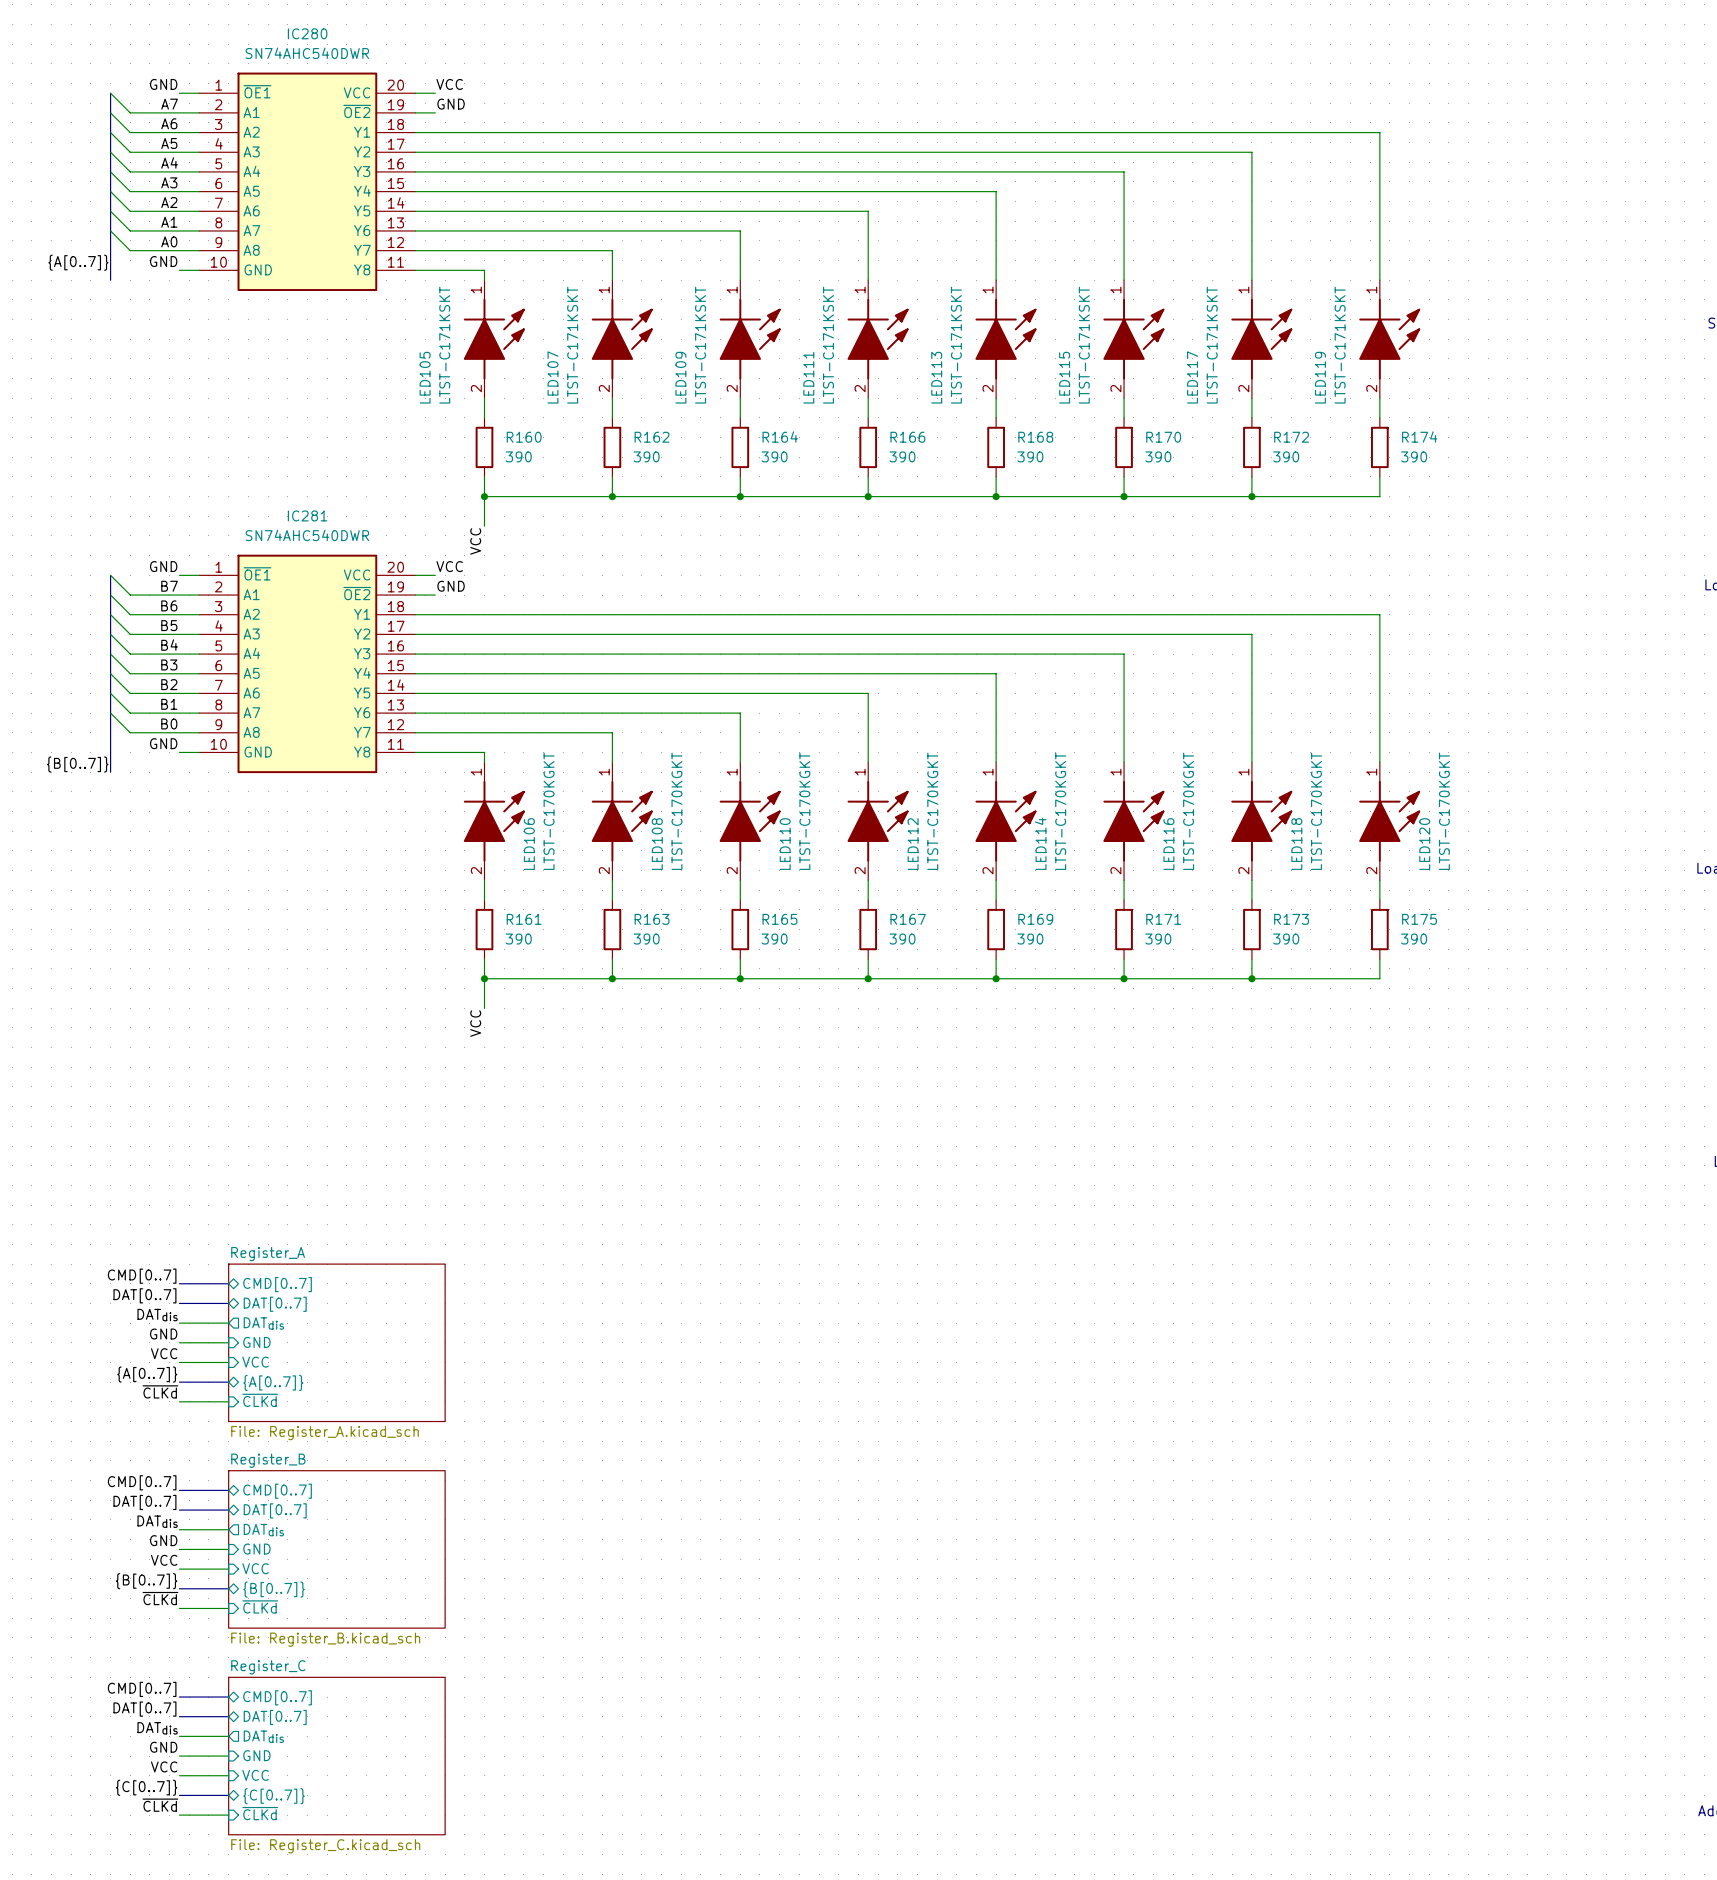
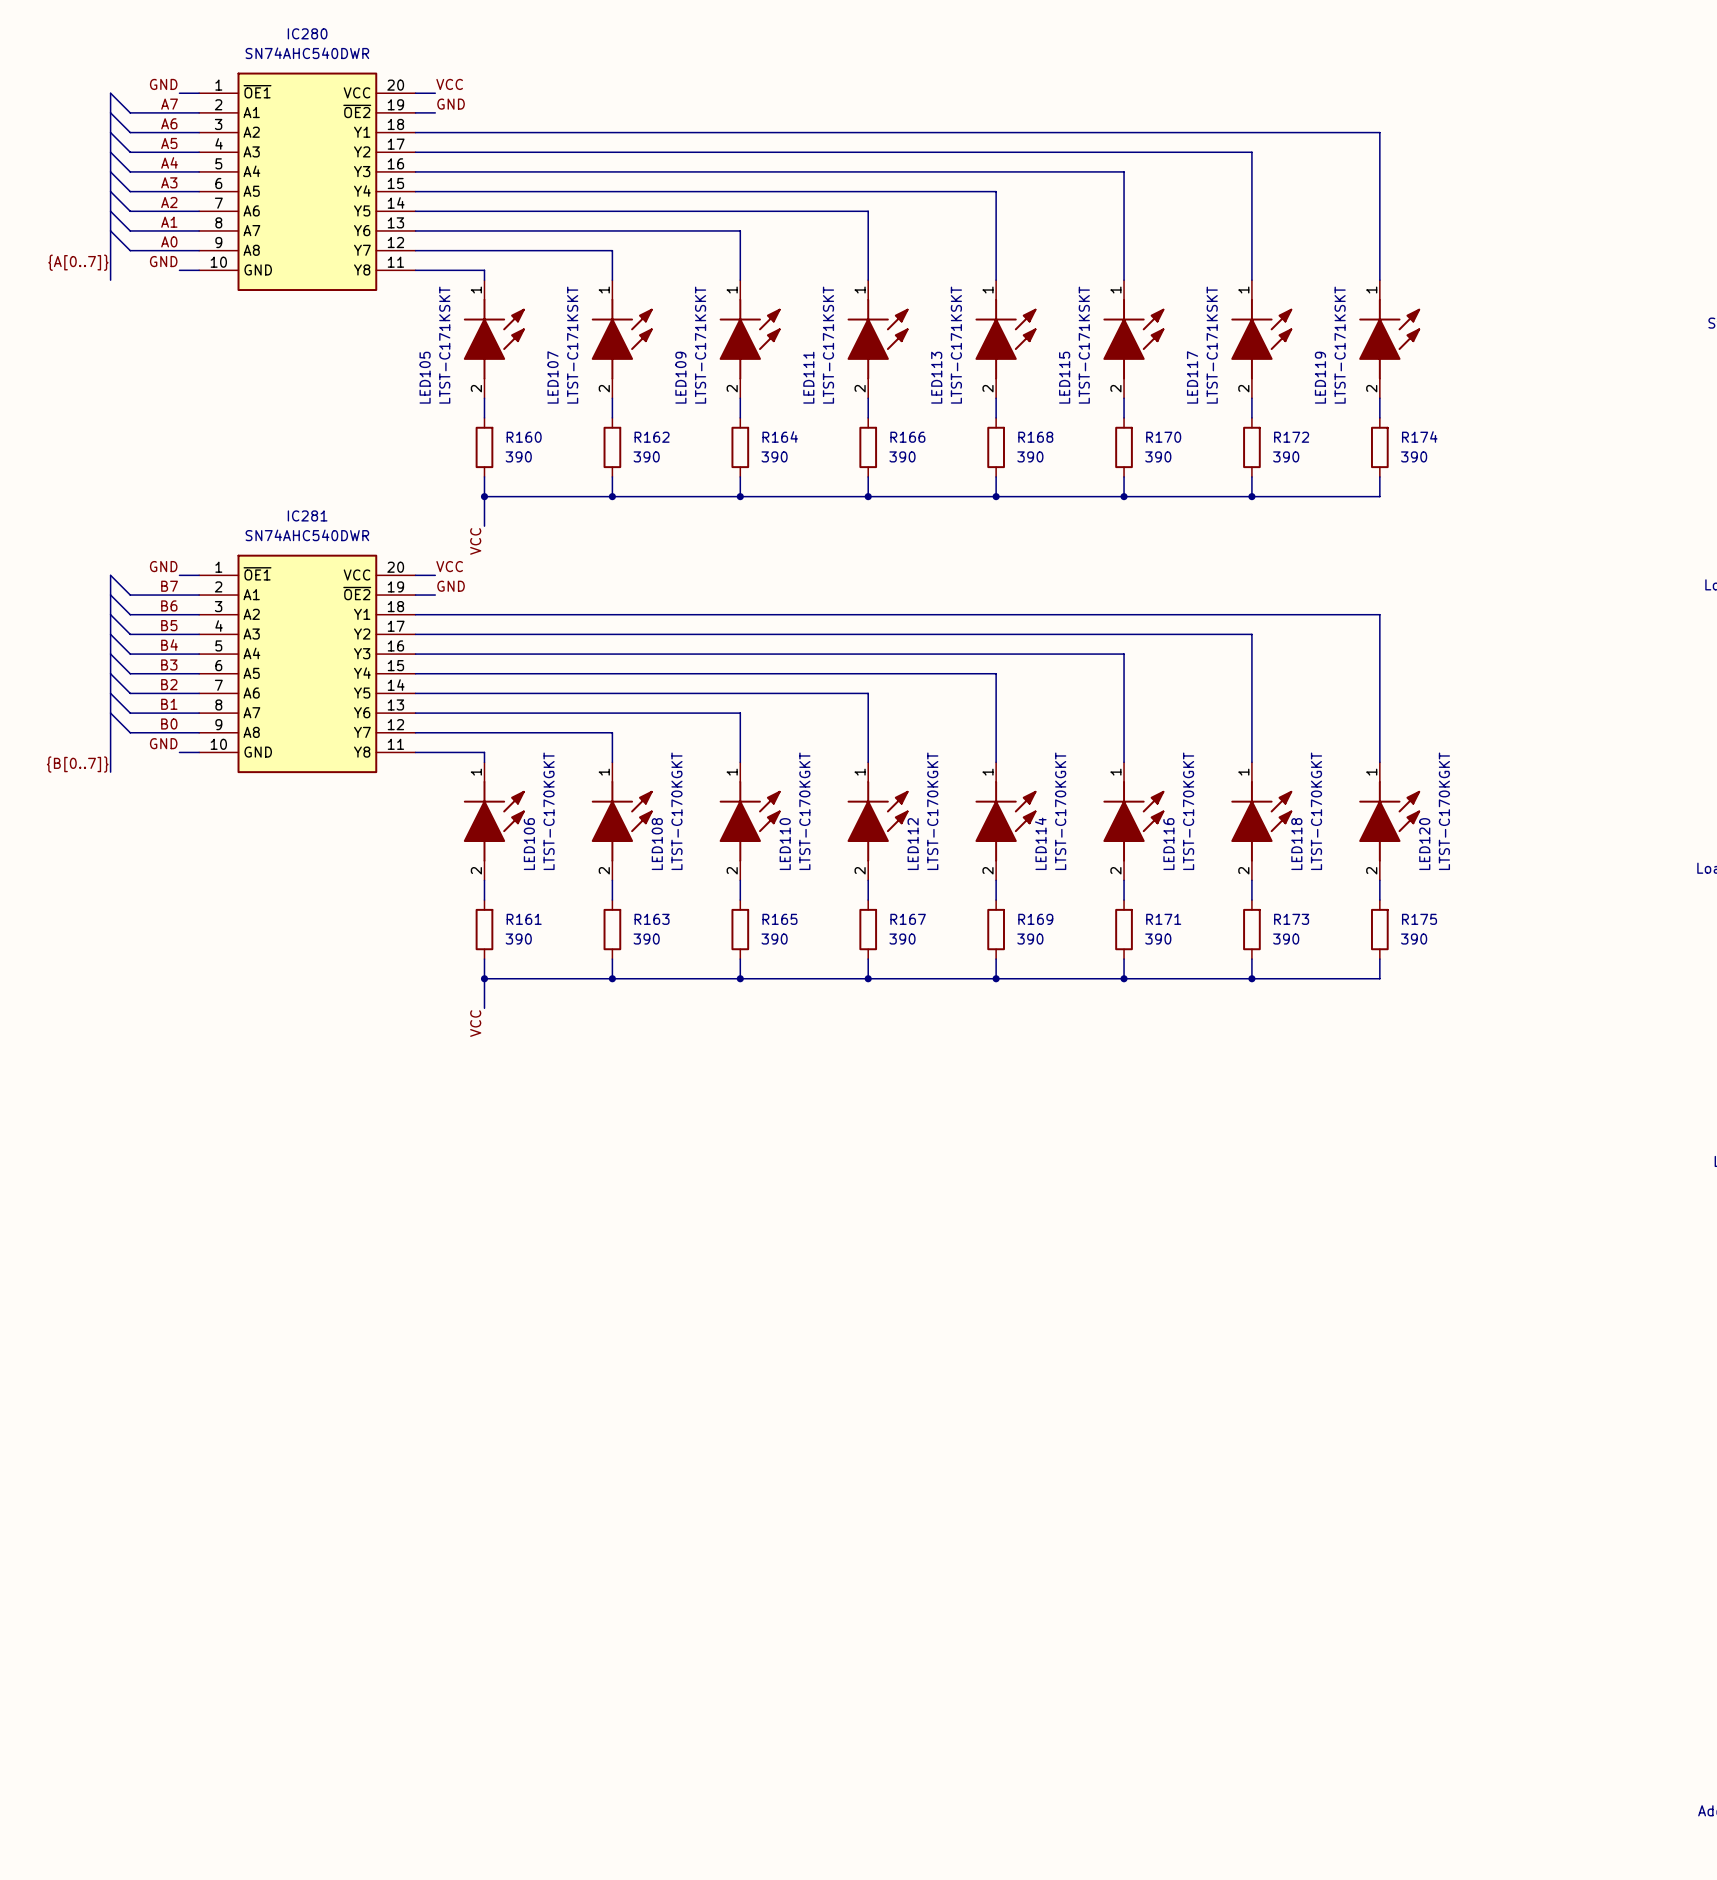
label: CMD[0..7] (142, 1276) -> none
bus: (179, 1283) (228, 1283) -> none
sheet pin: CMD[0..7] (277, 1284) -> none
label: DAT[0..7] (144, 1295) -> none
bus: (179, 1303) (228, 1303) -> none
sheet pin: DAT[0..7] (275, 1304) -> none
label: DATdis (157, 1315) -> none
wire: (179, 1323) (228, 1323) -> none
sheet pin: DATdis (263, 1323) -> none
label: GND (163, 1334) -> none
wire: (179, 1342) (228, 1342) -> none
sheet pin: GND (256, 1342) -> none
sheet Register_A: File: Register_A.kicad_sch (336, 1342) -> none
label: VCC (164, 1353) -> none
wire: (179, 1362) (228, 1362) -> none
sheet pin: VCC (255, 1362) -> none
label: {A[0..7]} (147, 1374) -> none
bus: (179, 1382) (228, 1382) -> none
sheet pin: {A[0..7]} (273, 1382) -> none
label: ~{CLKd} (160, 1391) -> none
sheet pin: ~{CLKd} (260, 1400) -> none
wire: (179, 1401) (228, 1401) -> none
label: CMD[0..7] (142, 1482) -> none
bus: (179, 1490) (228, 1490) -> none
sheet pin: CMD[0..7] (277, 1491) -> none
label: DAT[0..7] (144, 1502) -> none
bus: (179, 1510) (228, 1510) -> none
sheet pin: DAT[0..7] (275, 1510) -> none
label: DATdis (157, 1521) -> none
wire: (179, 1529) (228, 1529) -> none
sheet pin: DATdis (263, 1530) -> none
label: GND (163, 1540) -> none
wire: (179, 1549) (228, 1549) -> none
sheet pin: GND (256, 1549) -> none
sheet Register_B: File: Register_B.kicad_sch (336, 1549) -> none
label: VCC (164, 1560) -> none
sheet pin: VCC (255, 1568) -> none
wire: (179, 1569) (228, 1569) -> none
label: {B[0..7]} (146, 1581) -> none
bus: (179, 1588) (228, 1588) -> none
sheet pin: {B[0..7]} (274, 1589) -> none
label: ~{CLKd} (160, 1598) -> none
sheet pin: ~{CLKd} (260, 1606) -> none
wire: (179, 1608) (228, 1608) -> none
label: CMD[0..7] (142, 1689) -> none
bus: (179, 1697) (228, 1697) -> none
sheet pin: CMD[0..7] (277, 1697) -> none
label: DAT[0..7] (144, 1709) -> none
bus: (179, 1716) (228, 1716) -> none
sheet pin: DAT[0..7] (275, 1717) -> none
label: DATdis (157, 1728) -> none
wire: (179, 1736) (228, 1736) -> none
sheet pin: DATdis (263, 1736) -> none
label: GND (163, 1747) -> none
sheet pin: GND (256, 1755) -> none
wire: (179, 1756) (228, 1756) -> none
sheet Register_C: File: Register_C.kicad_sch (336, 1756) -> none
label: VCC (164, 1766) -> none
wire: (179, 1775) (228, 1775) -> none
sheet pin: VCC (255, 1775) -> none
label: {C[0..7]} (146, 1787) -> none
bus: (179, 1795) (228, 1795) -> none
sheet pin: {C[0..7]} (274, 1796) -> none
label: ~{CLKd} (160, 1805) -> none
sheet pin: ~{CLKd} (260, 1813) -> none
wire: (179, 1815) (228, 1815) -> none

